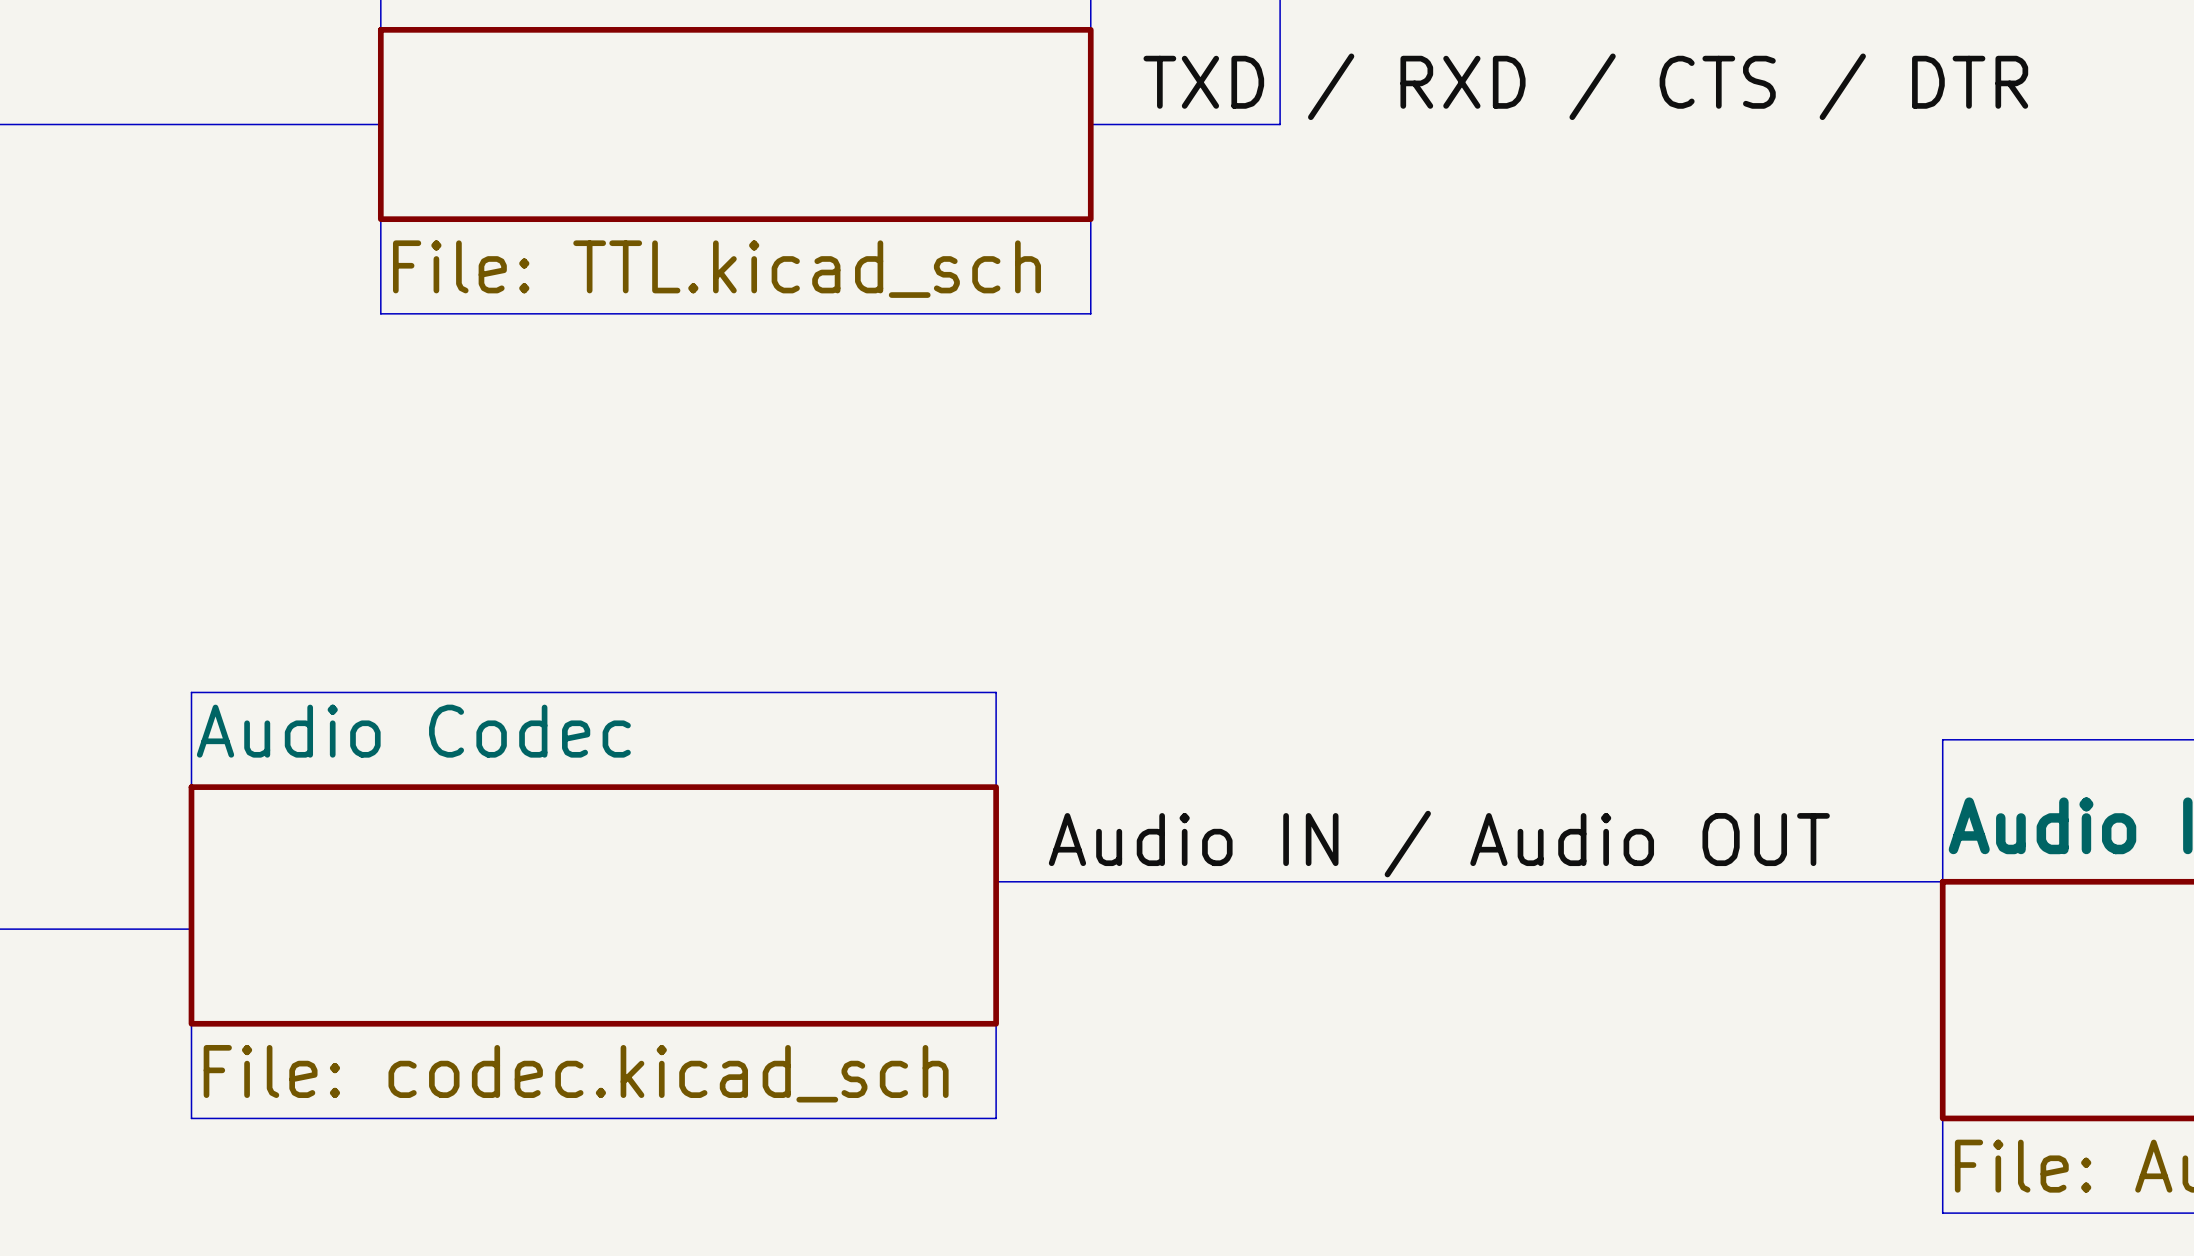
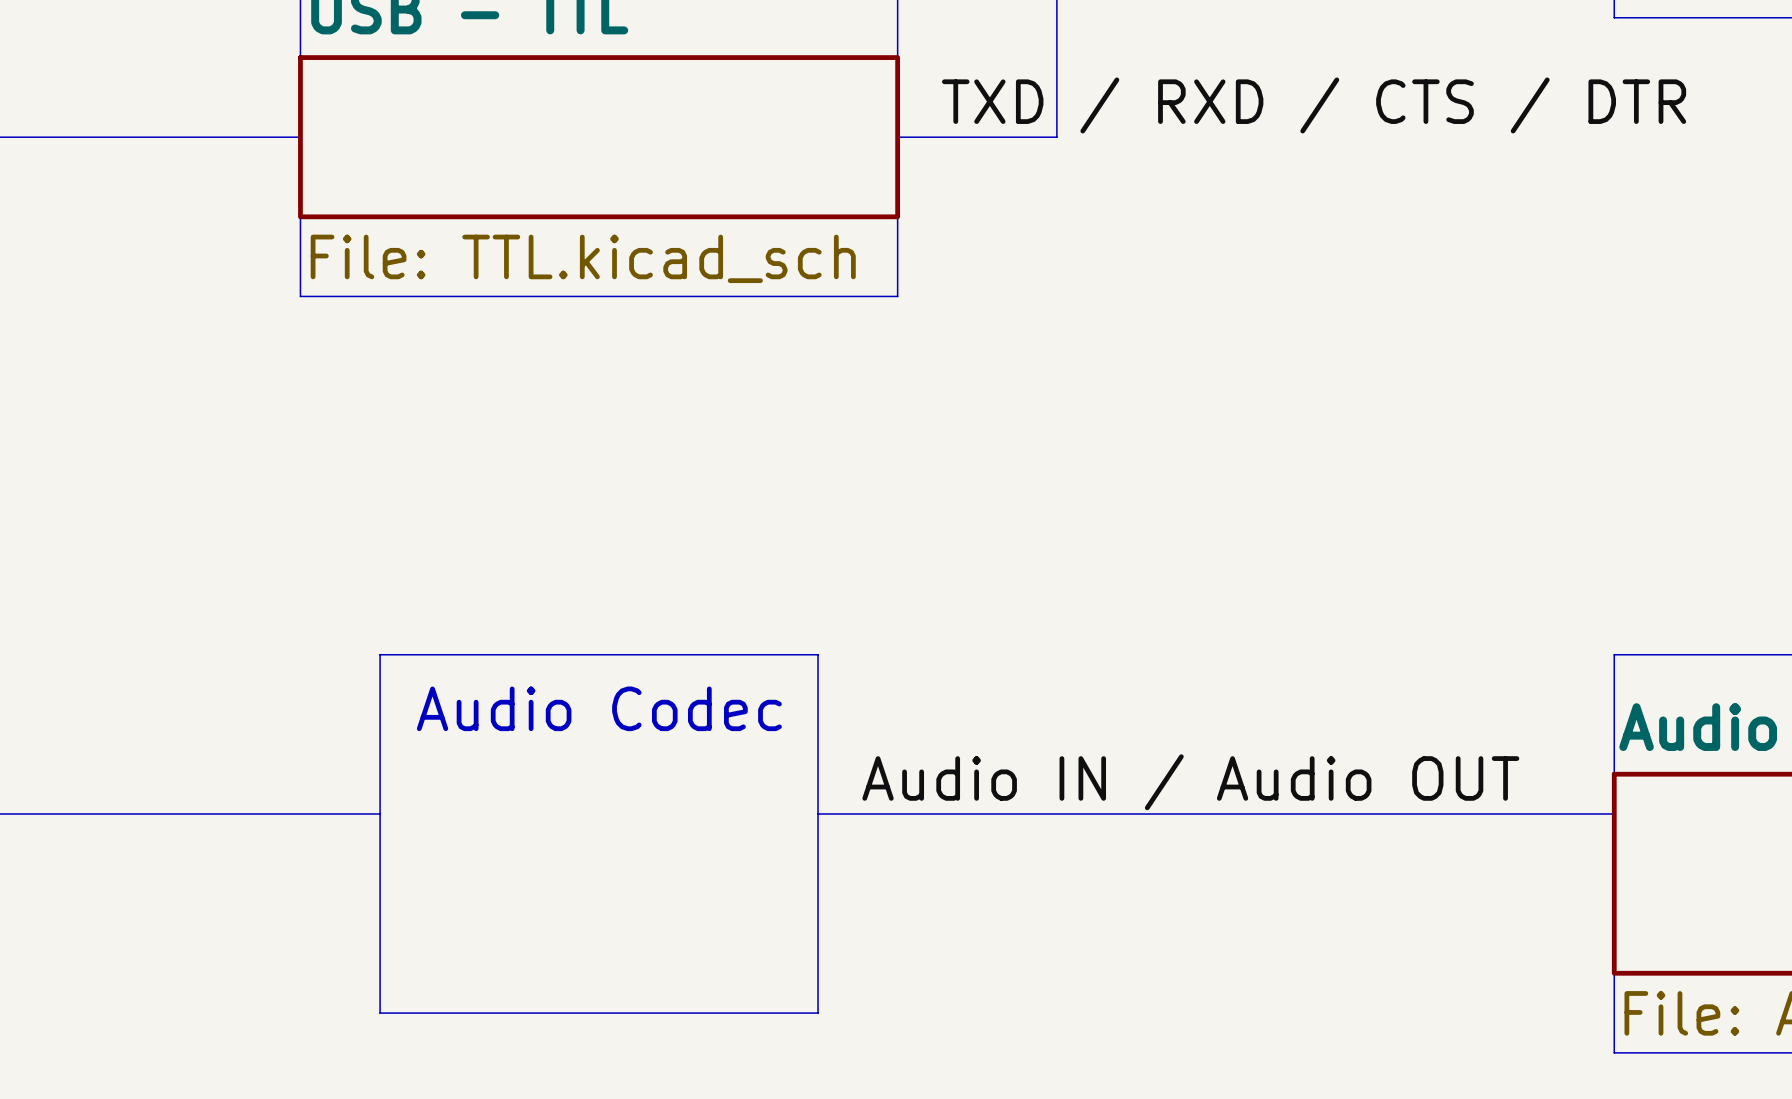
line: (996, 739) (996, 692) (191, 692) (191, 1118) (996, 1118) -> (818, 654) (380, 654) (380, 1013) (818, 1013) (818, 973)
text: none -> Audio Codec (599, 708)
label position: Audio IN / Audio OUT (1439, 844) -> Audio IN / Audio OUT (1190, 782)
line: (996, 881) (1942, 881) -> (818, 814) (1614, 814)
sheet Audio Codec: File: codec.kicad_sch (593, 905) -> none
line: none -> (141, 814) (380, 814)

